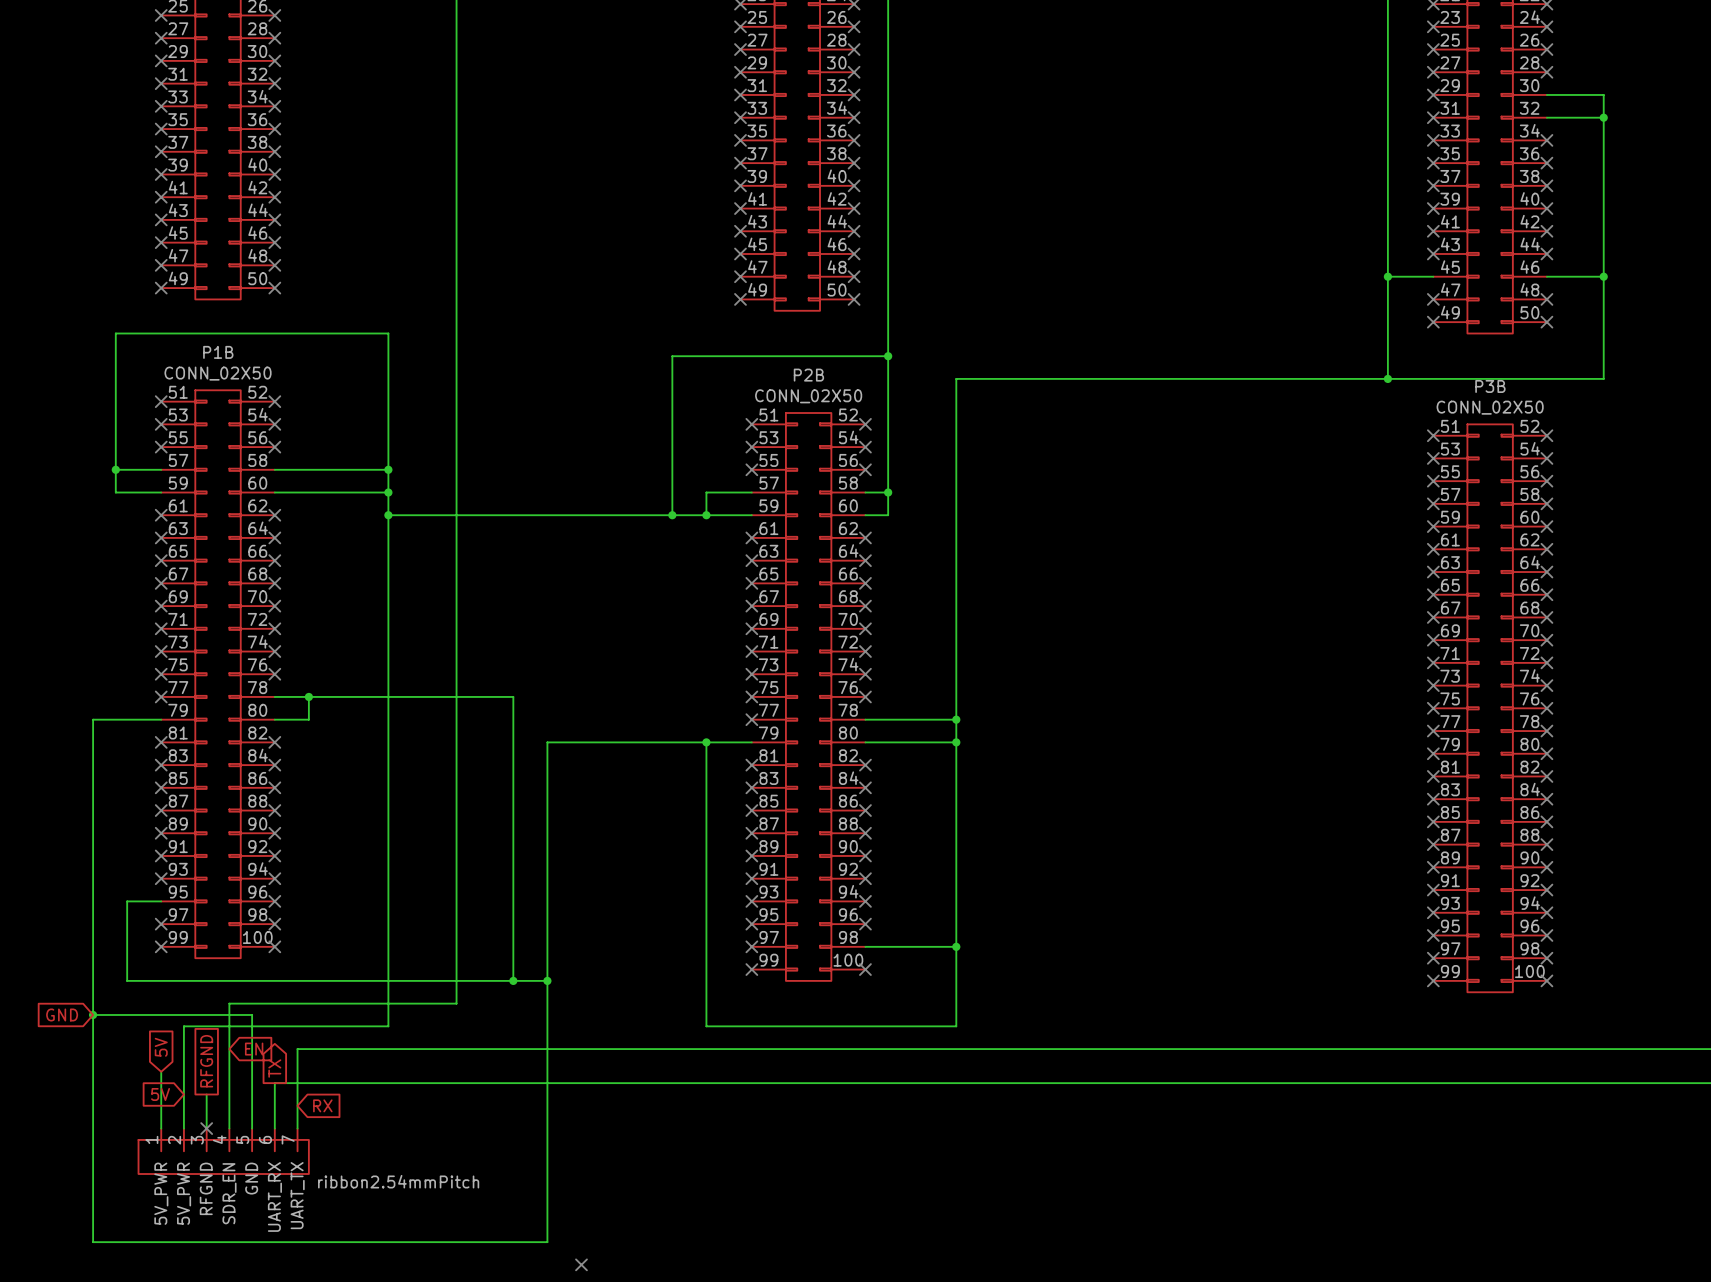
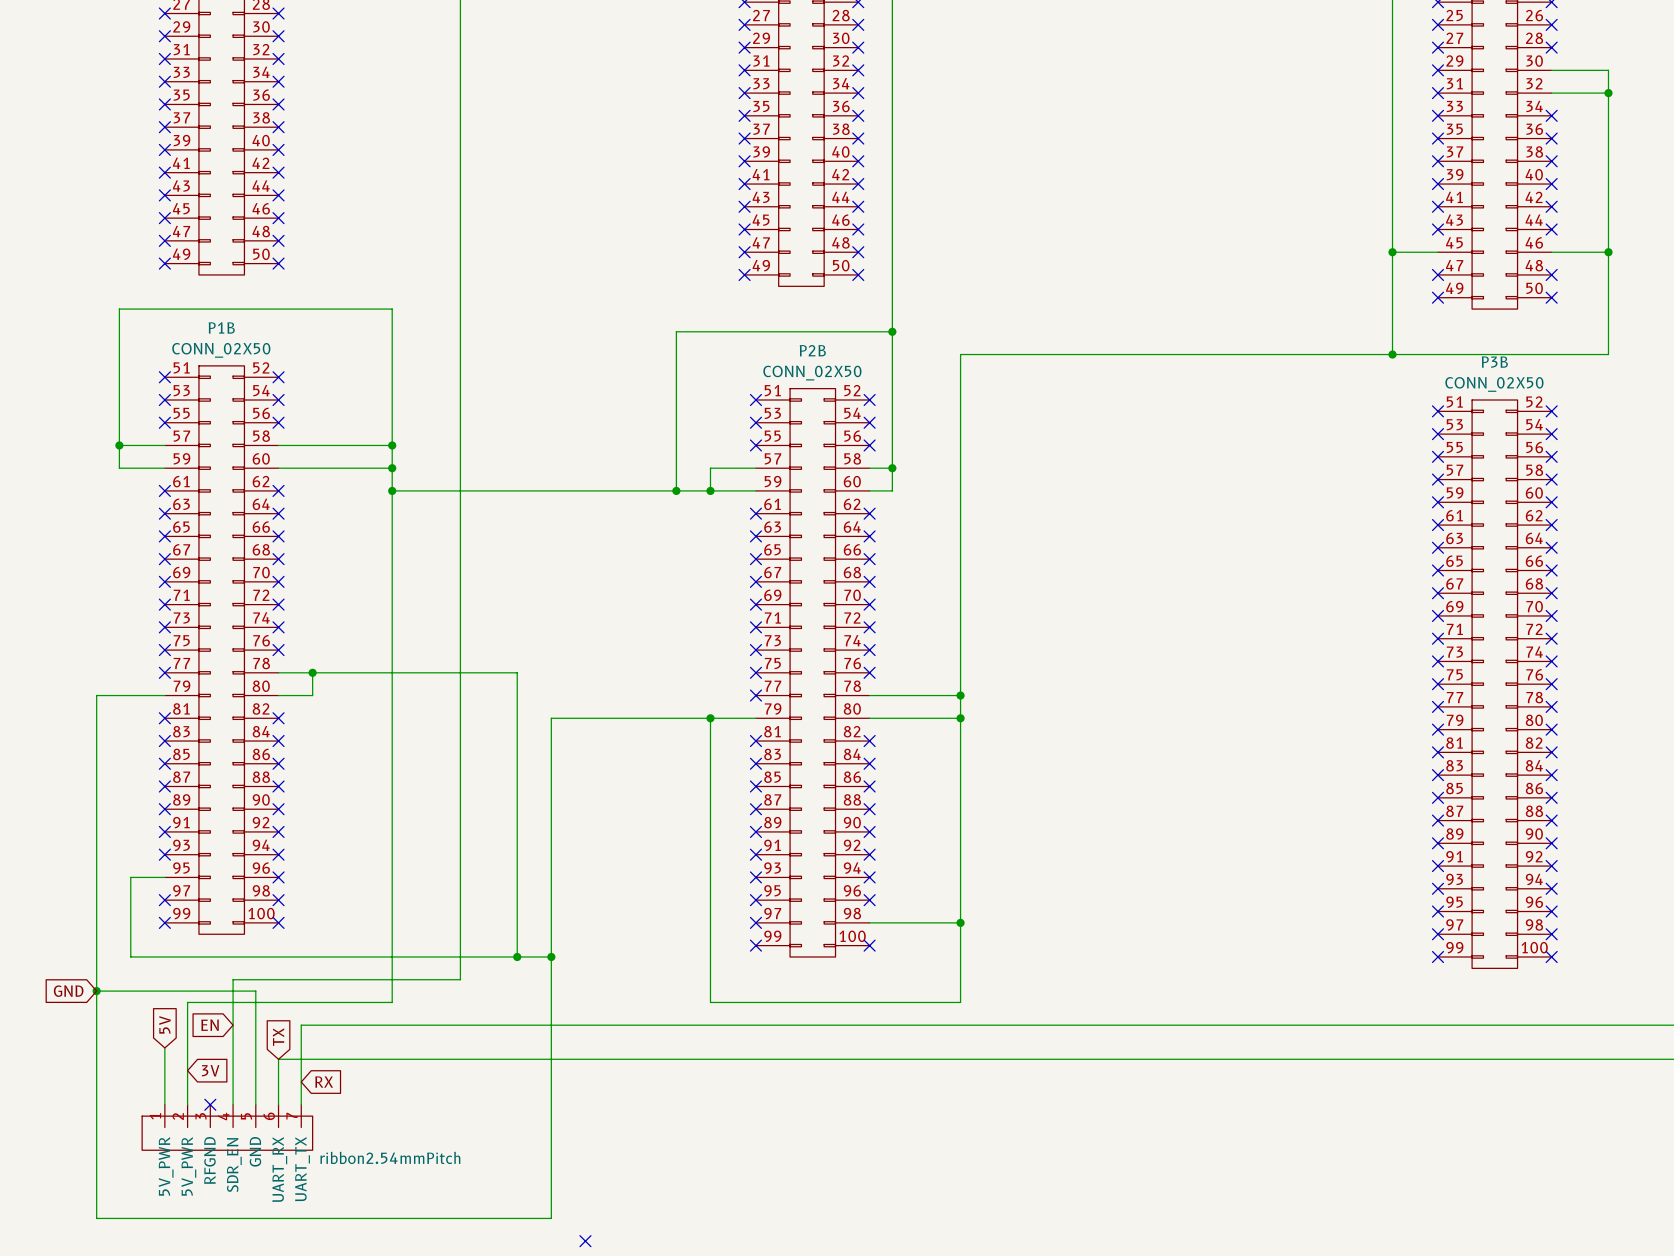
global label rotation: 0° (254, 1049) -> 180° (210, 1025)
global label position: EN (254, 1049) -> EN (210, 1025)
global label: RFGND (206, 1061) -> none
global label shape: output (274, 1068) -> input (278, 1037)
global label: 5V (160, 1094) -> 3V (210, 1070)
wire: (206, 1094) (206, 1128) -> none

